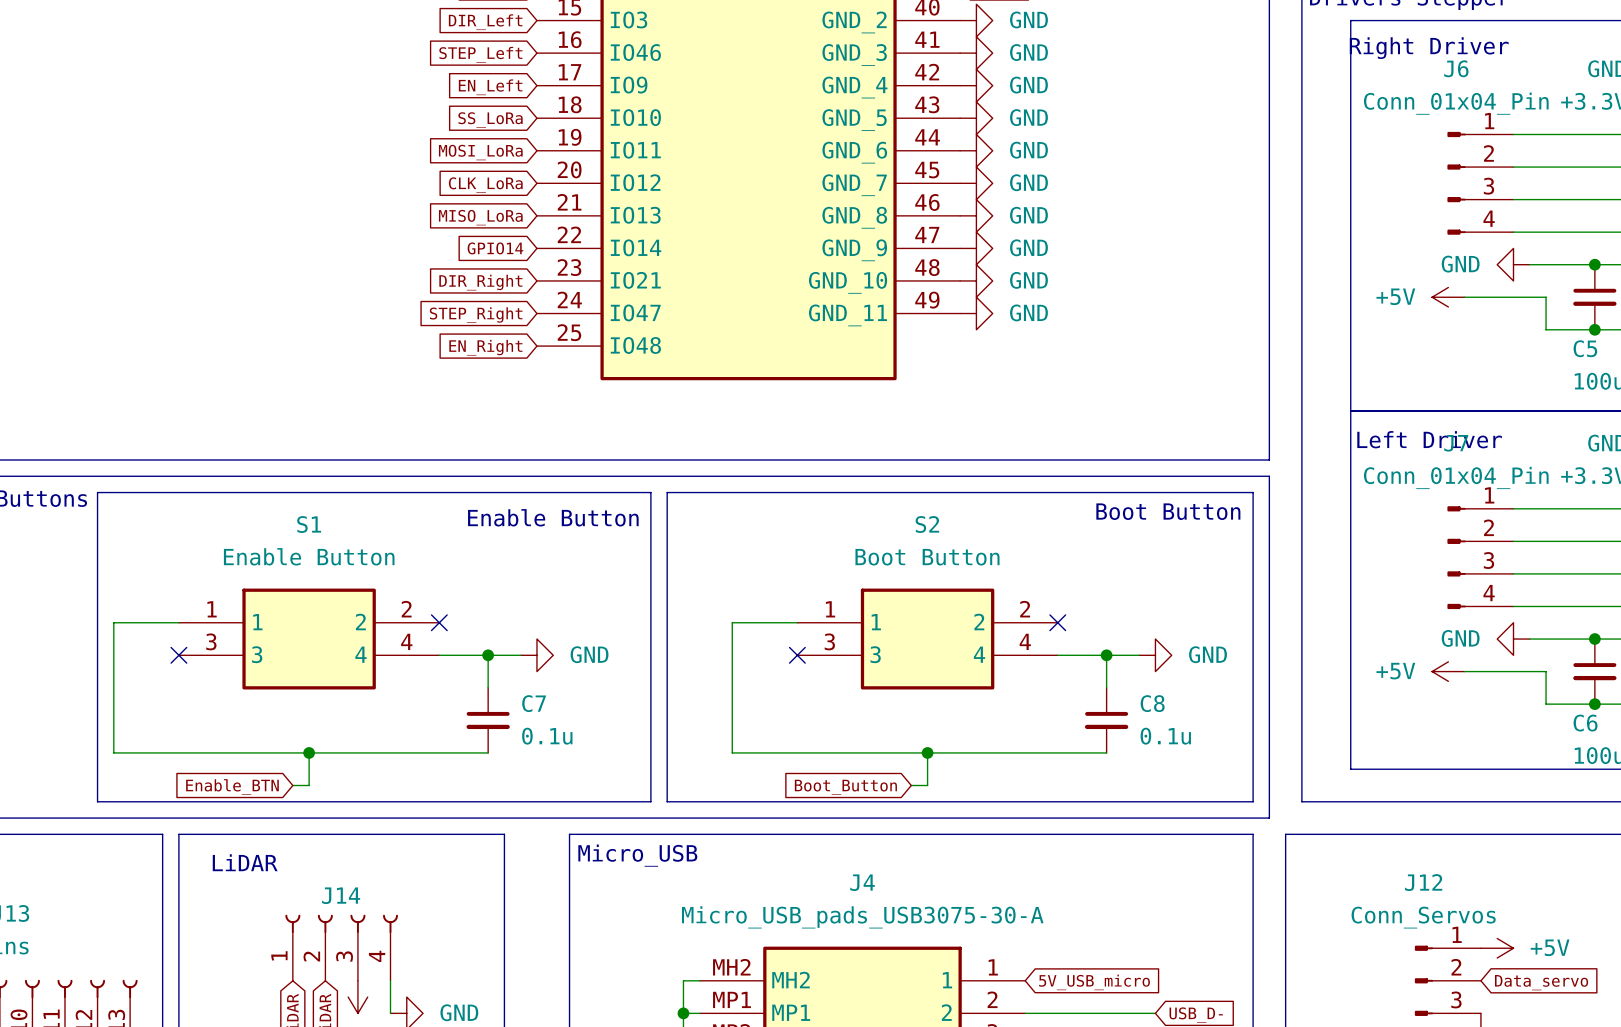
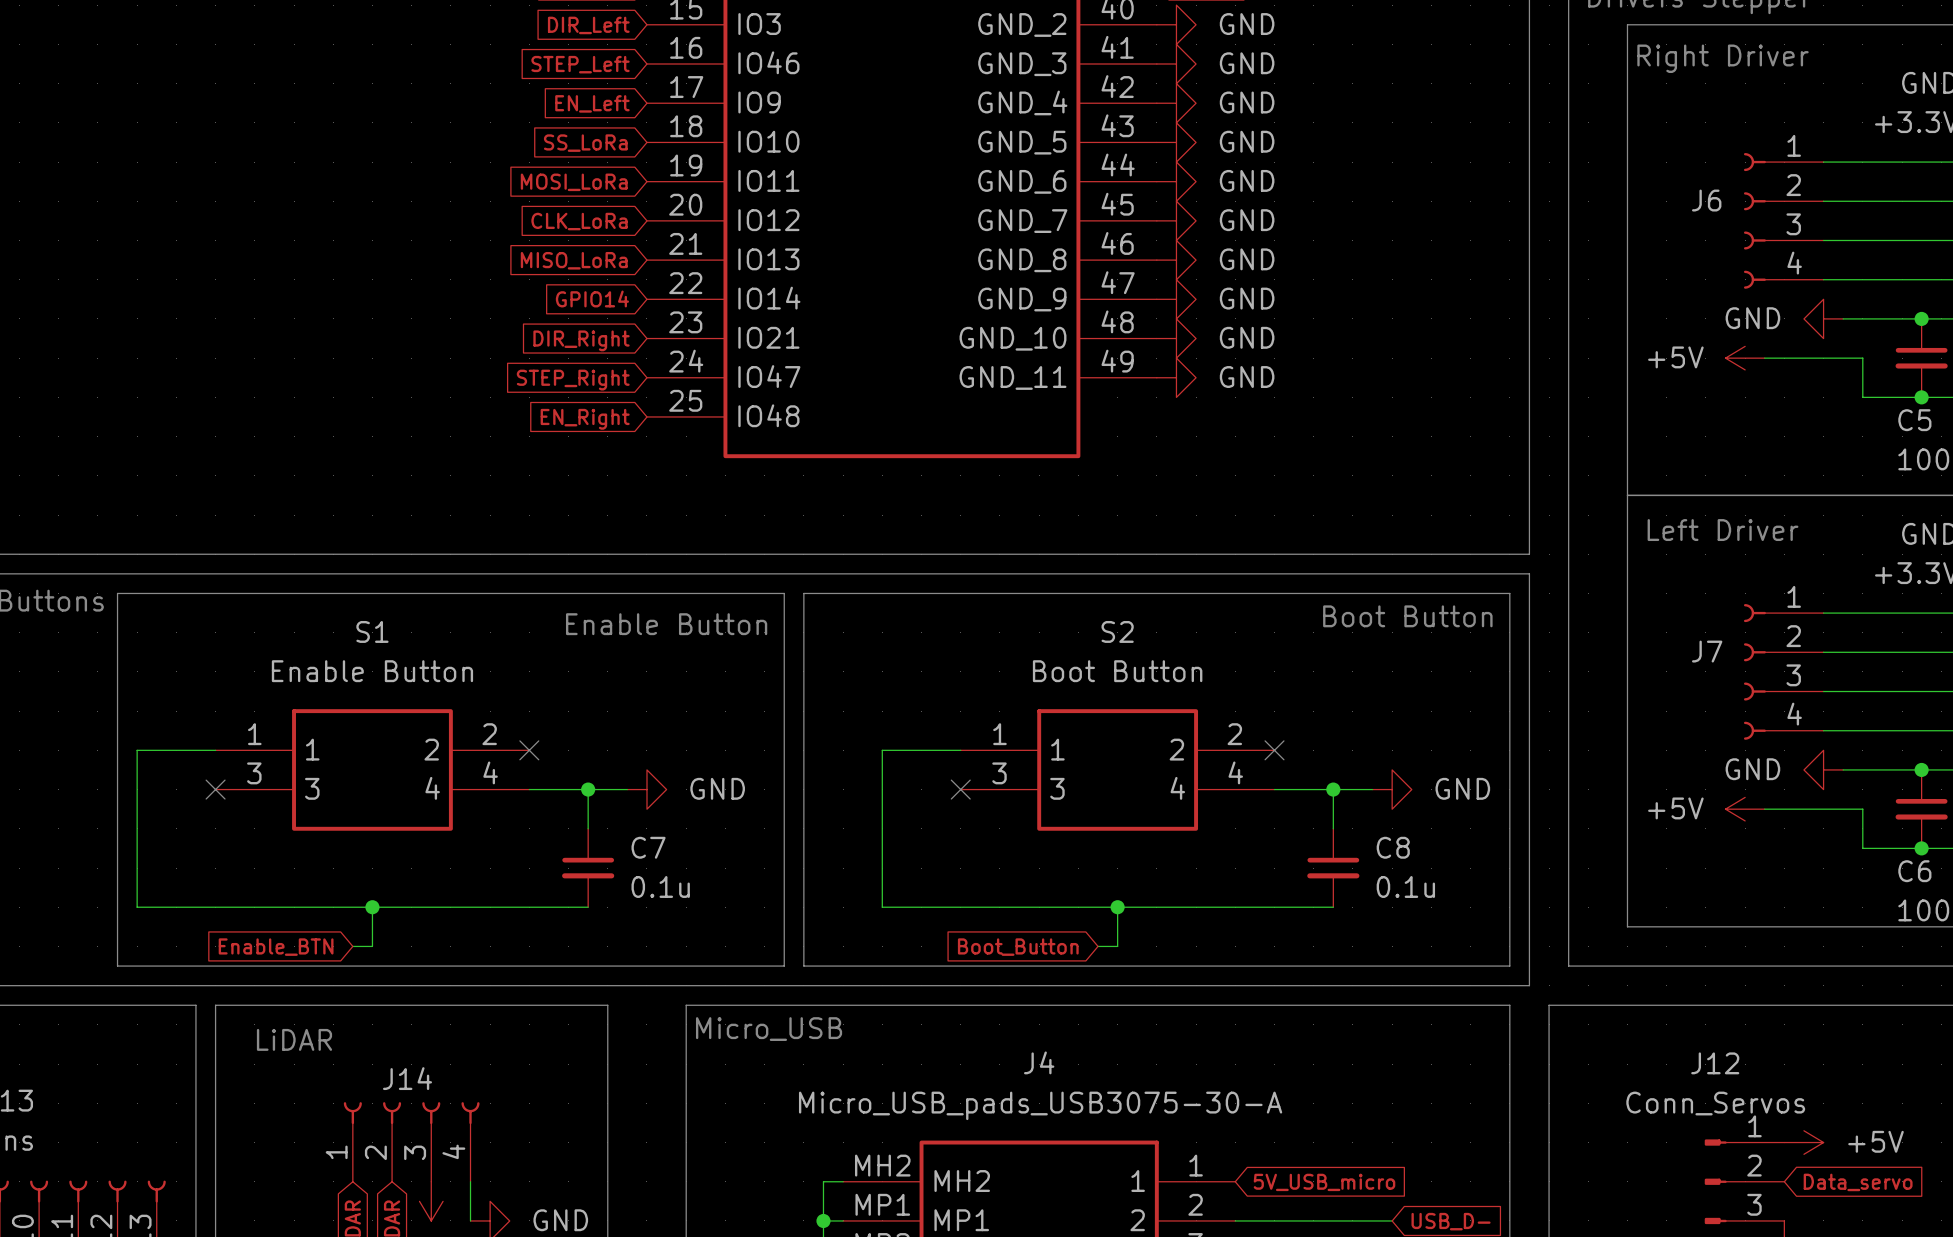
J6 name position: J6 (1456, 68) -> J6 (1706, 200)
J6 value: Conn_01x04_Pin (1456, 103) -> none
J6 symbol: [1447, 131, 1514, 235] -> [1743, 153, 1824, 289]
J7 name position: J7 (1456, 443) -> J7 (1707, 651)
J7 value: Conn_01x04_Pin (1456, 477) -> none
J7 symbol: [1447, 506, 1514, 610] -> [1743, 604, 1824, 740]

